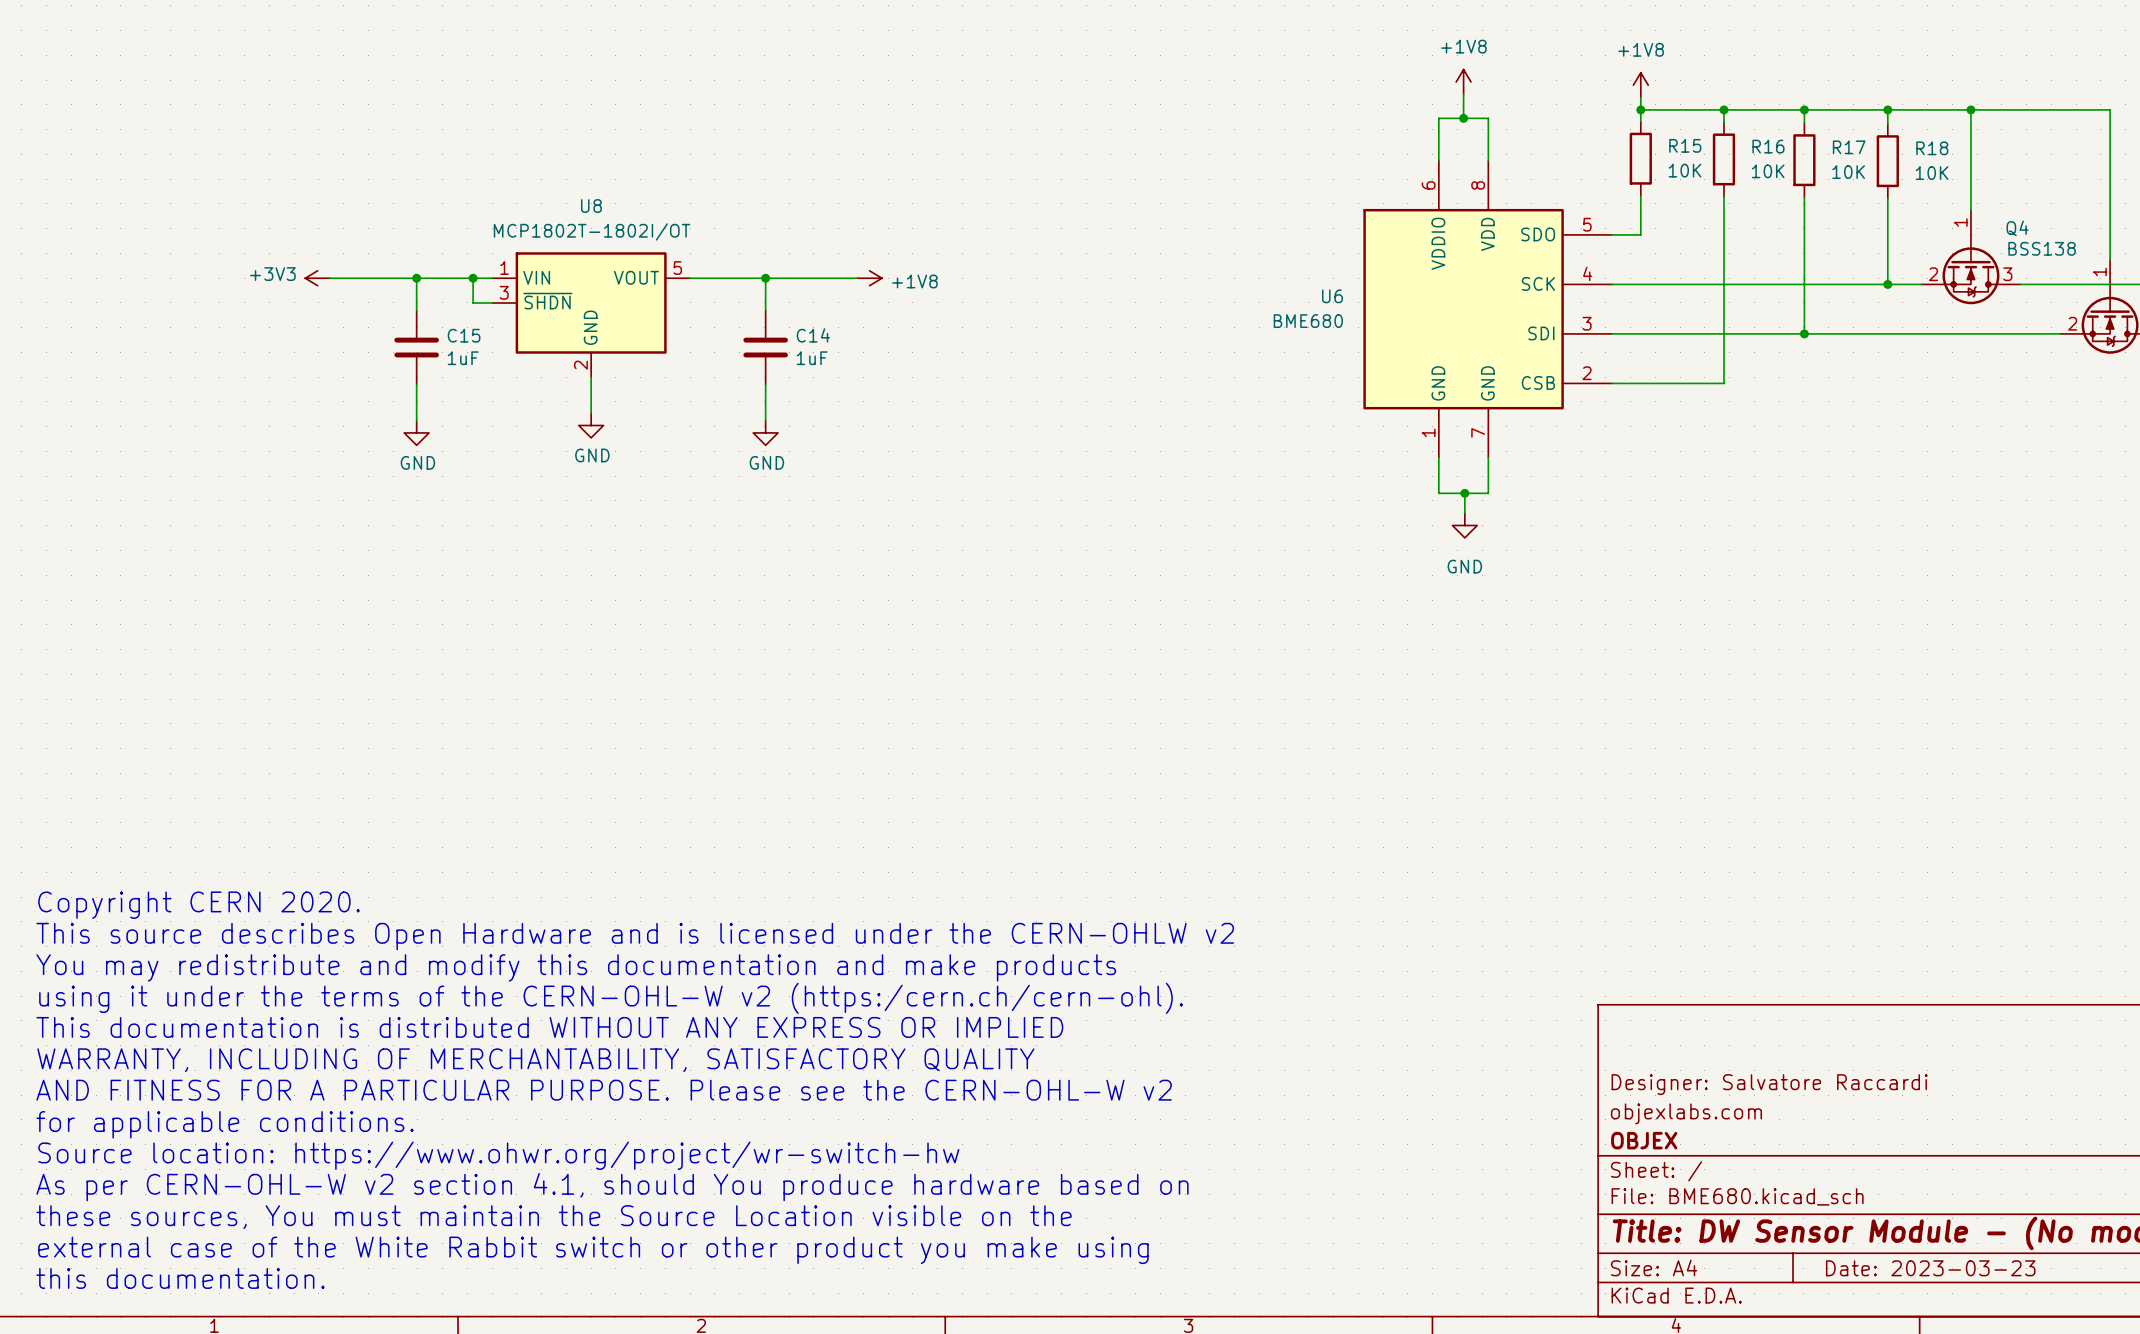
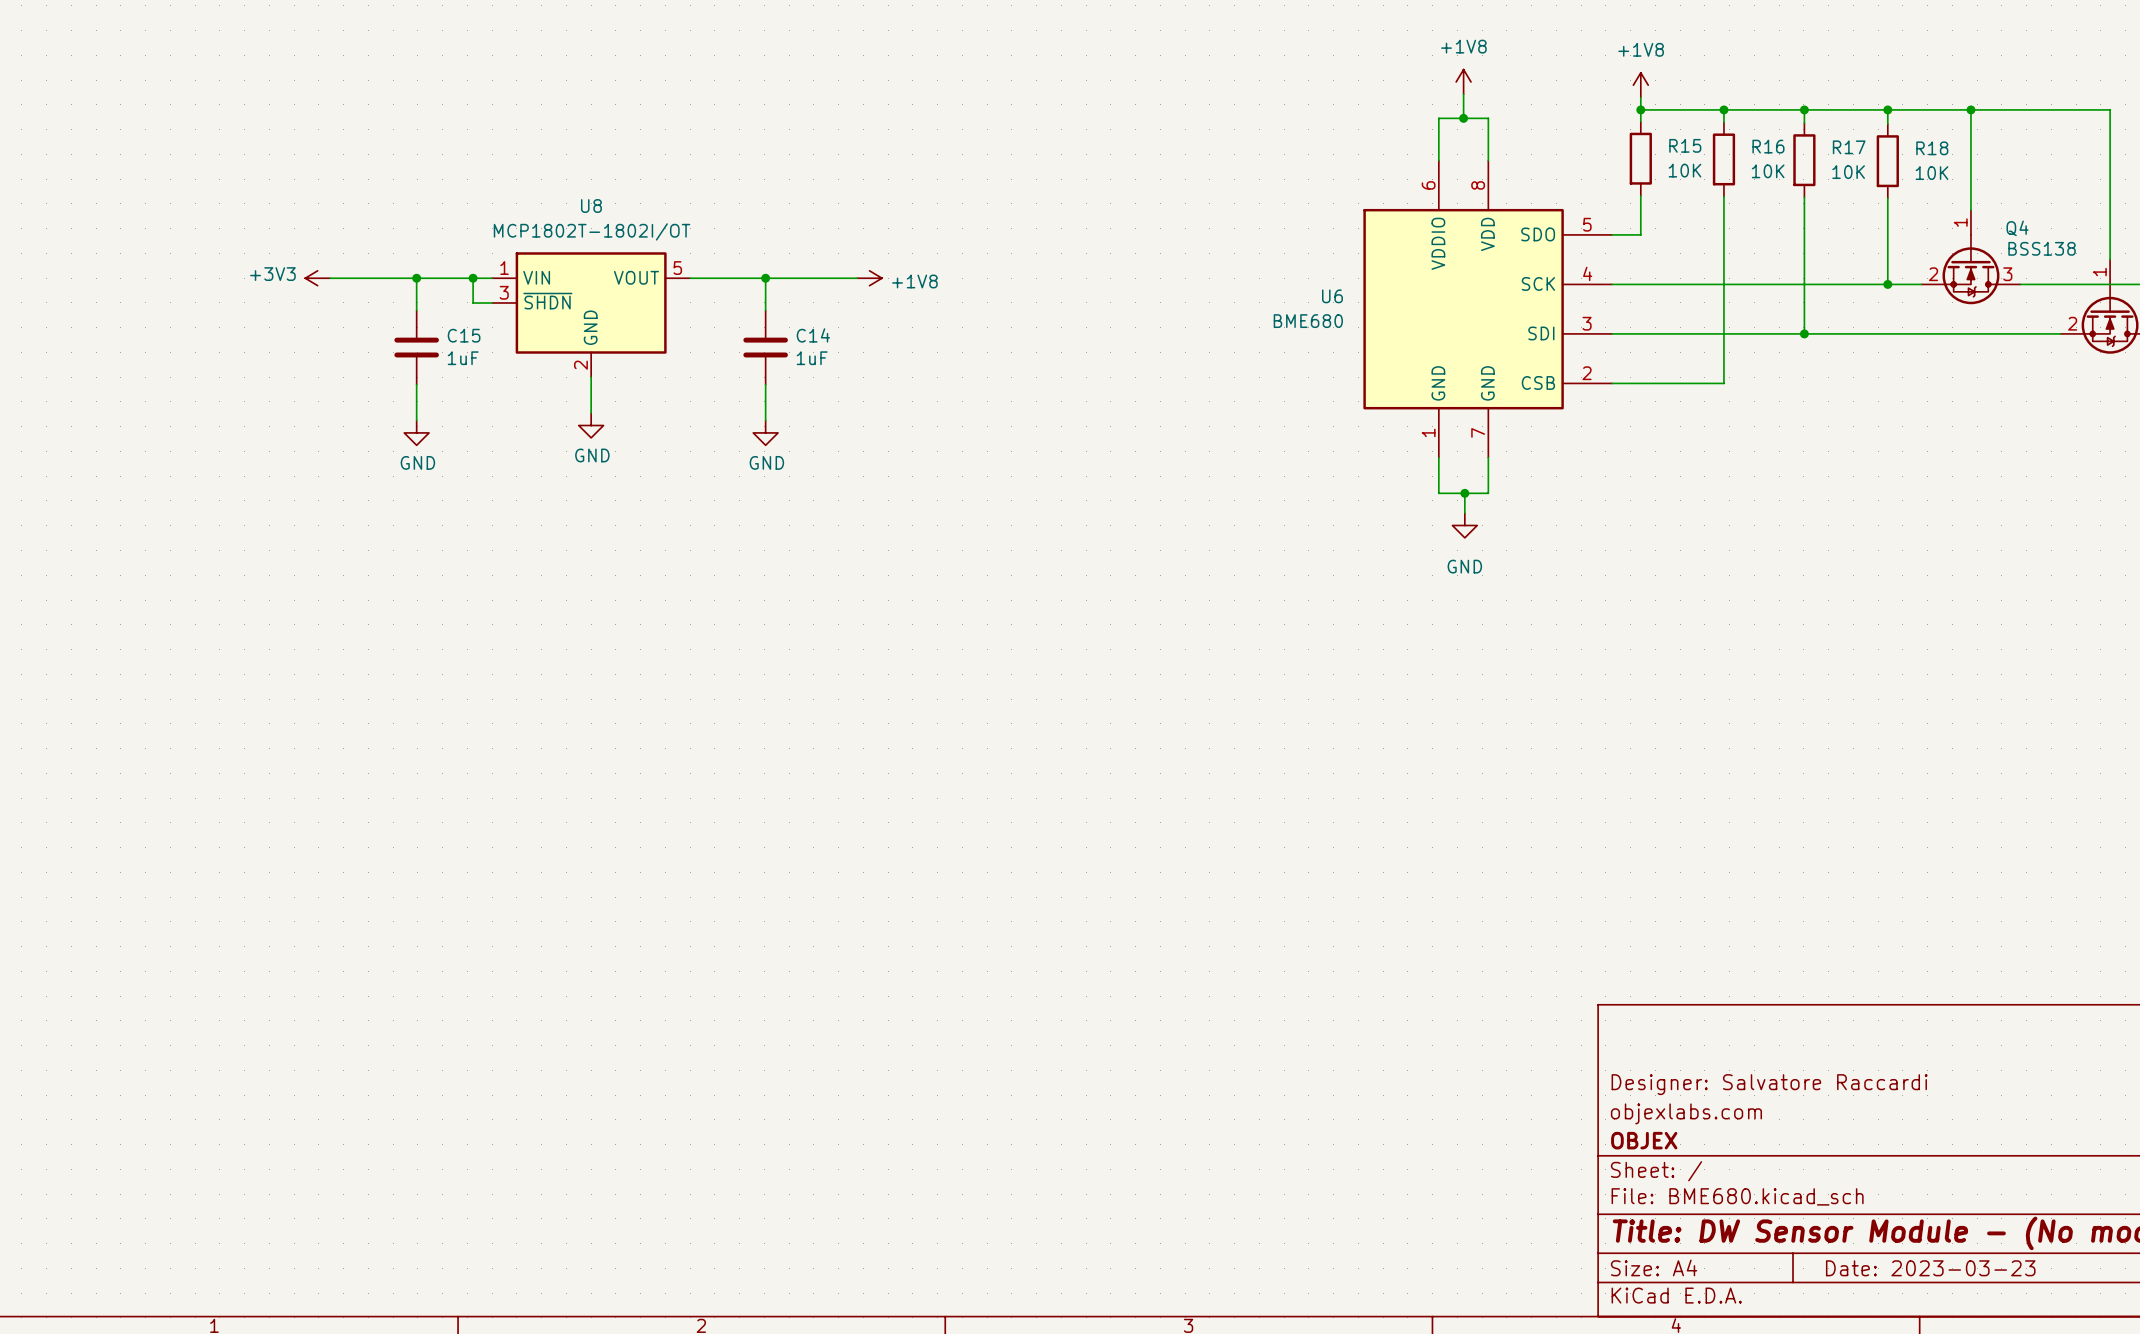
text: Copyright CERN 2020. (199, 905) -> none
text: This source describes Open Hardware and is licensed under the CERN-OHLW v2 (635, 936) -> none
text: You may redistribute and modify this documentation and make products (576, 967) -> none
text: using it under the terms of the CERN-OHL-W v2 (https:/cern.ch/cern-ohl). (611, 998) -> none
text: This documentation is distributed WITHOUT ANY EXPRESS OR IMPLIED (549, 1027) -> none
text: WARRANTY, INCLUDING OF MERCHANTABILITY, SATISFACTORY QUALITY (535, 1060) -> none
text: AND FITNESS FOR A PARTICULAR PURPOSE. Please see the CERN-OHL-W v2 (604, 1090) -> none
text: for applicable conditions. (225, 1124) -> none
text: Source location: https://www.ohwr.org/project/wr-switch-hw (498, 1155) -> none
text: As per CERN-OHL-W v2 section 4.1, should You produce hardware based on (612, 1187) -> none
text: these sources, You must maintain the Source Location visible on the (554, 1217) -> none
text: external case of the White Rabbit switch or other product you make using (593, 1250) -> none
text: this documentation. (180, 1278) -> none

